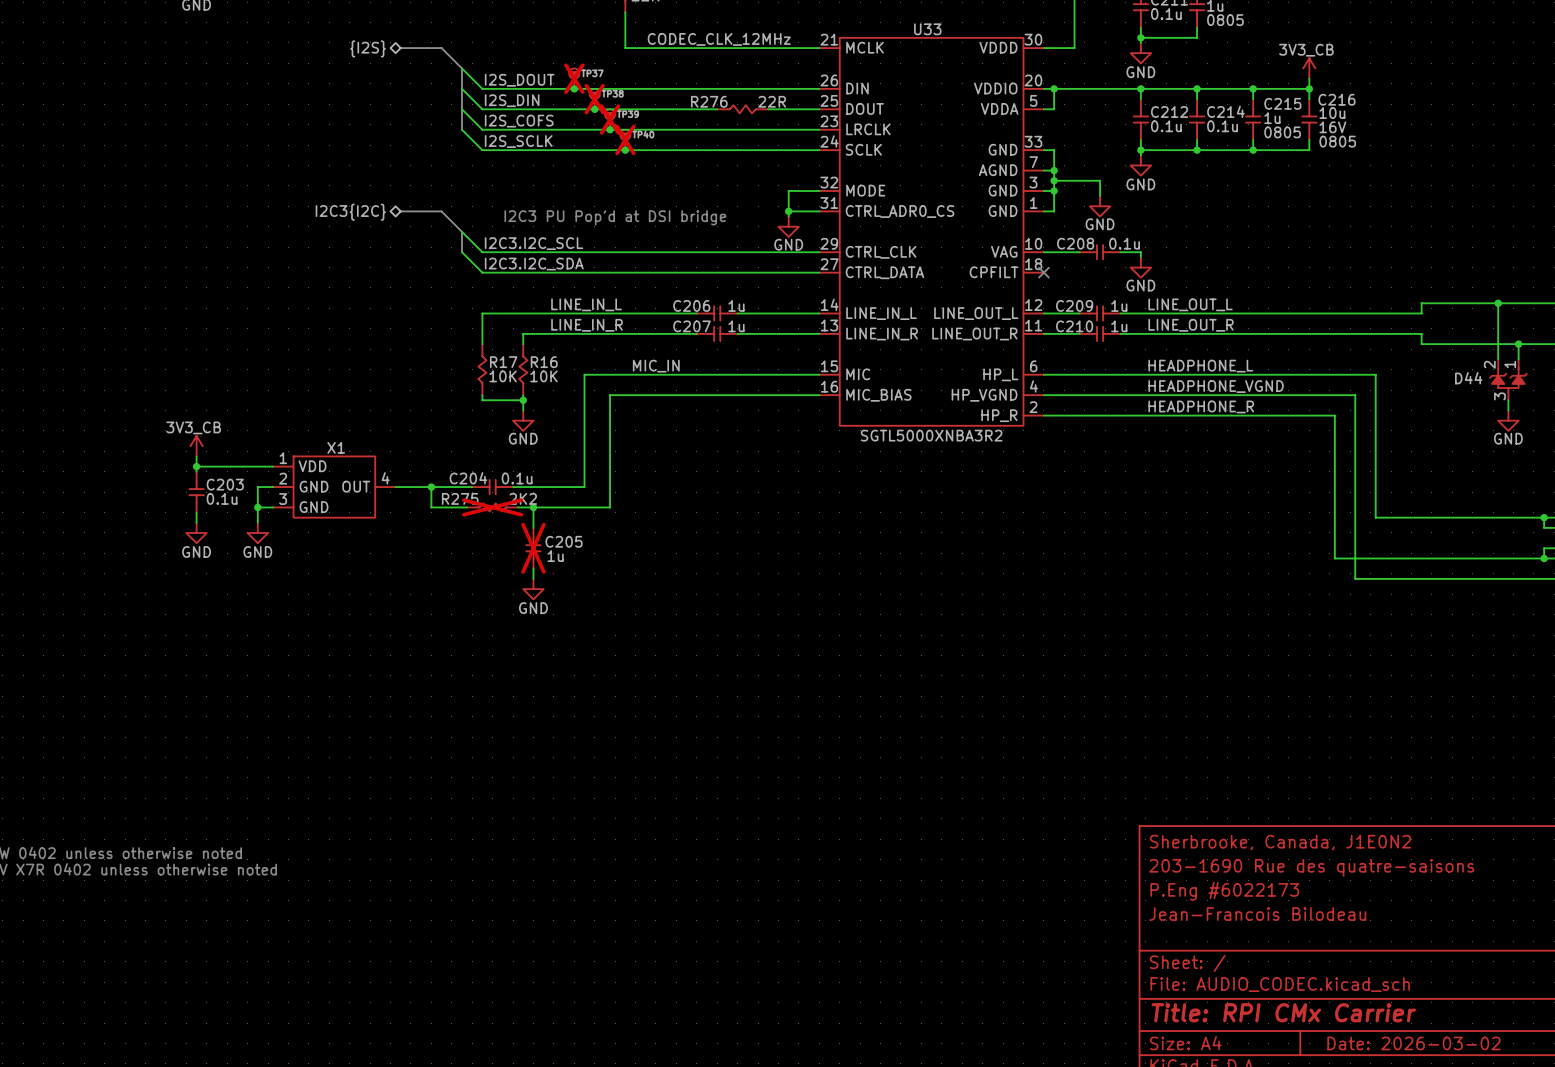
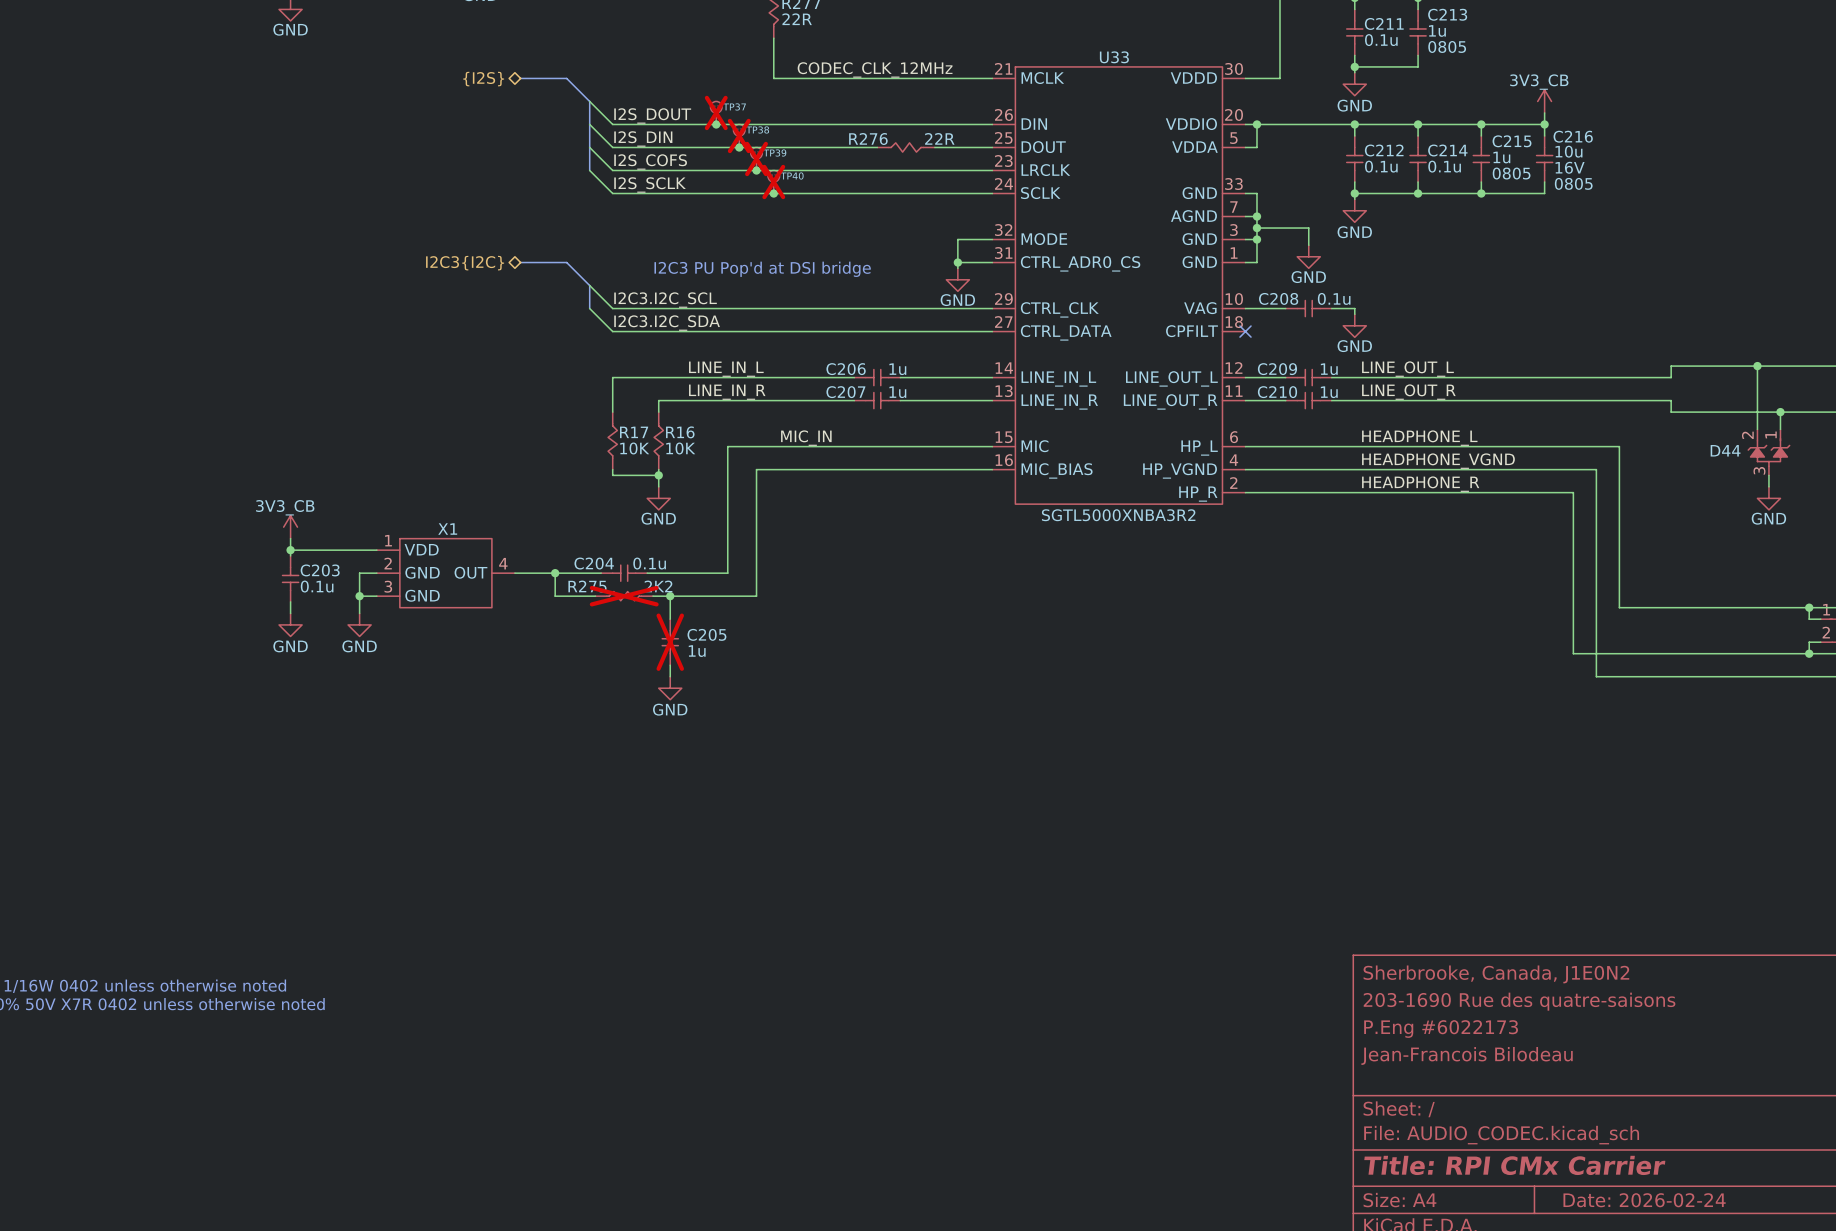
title block: Date: 2026-03-02 (1413, 1043) -> Date: 2026-02-24 (1644, 1200)

